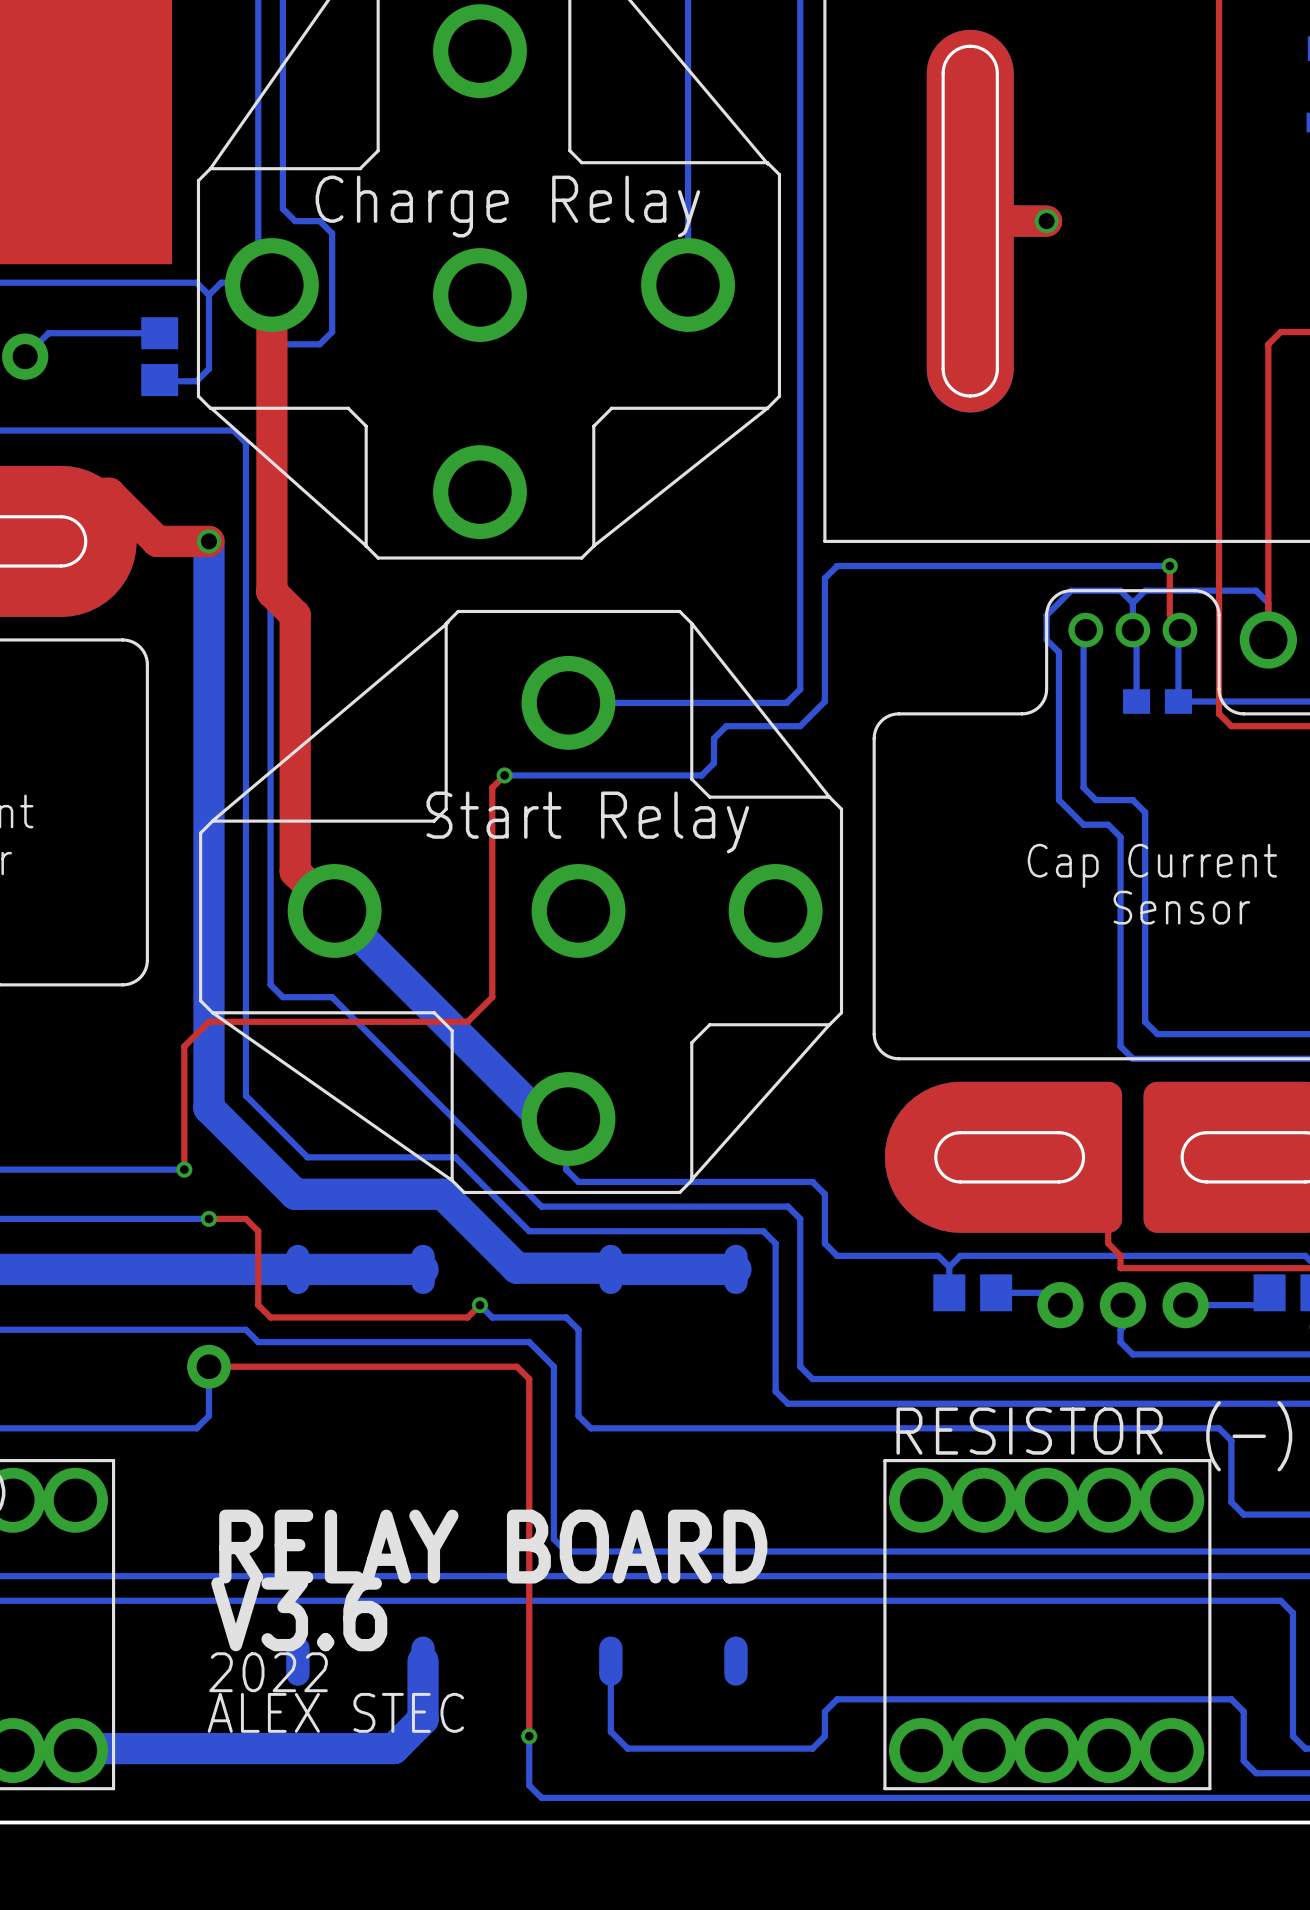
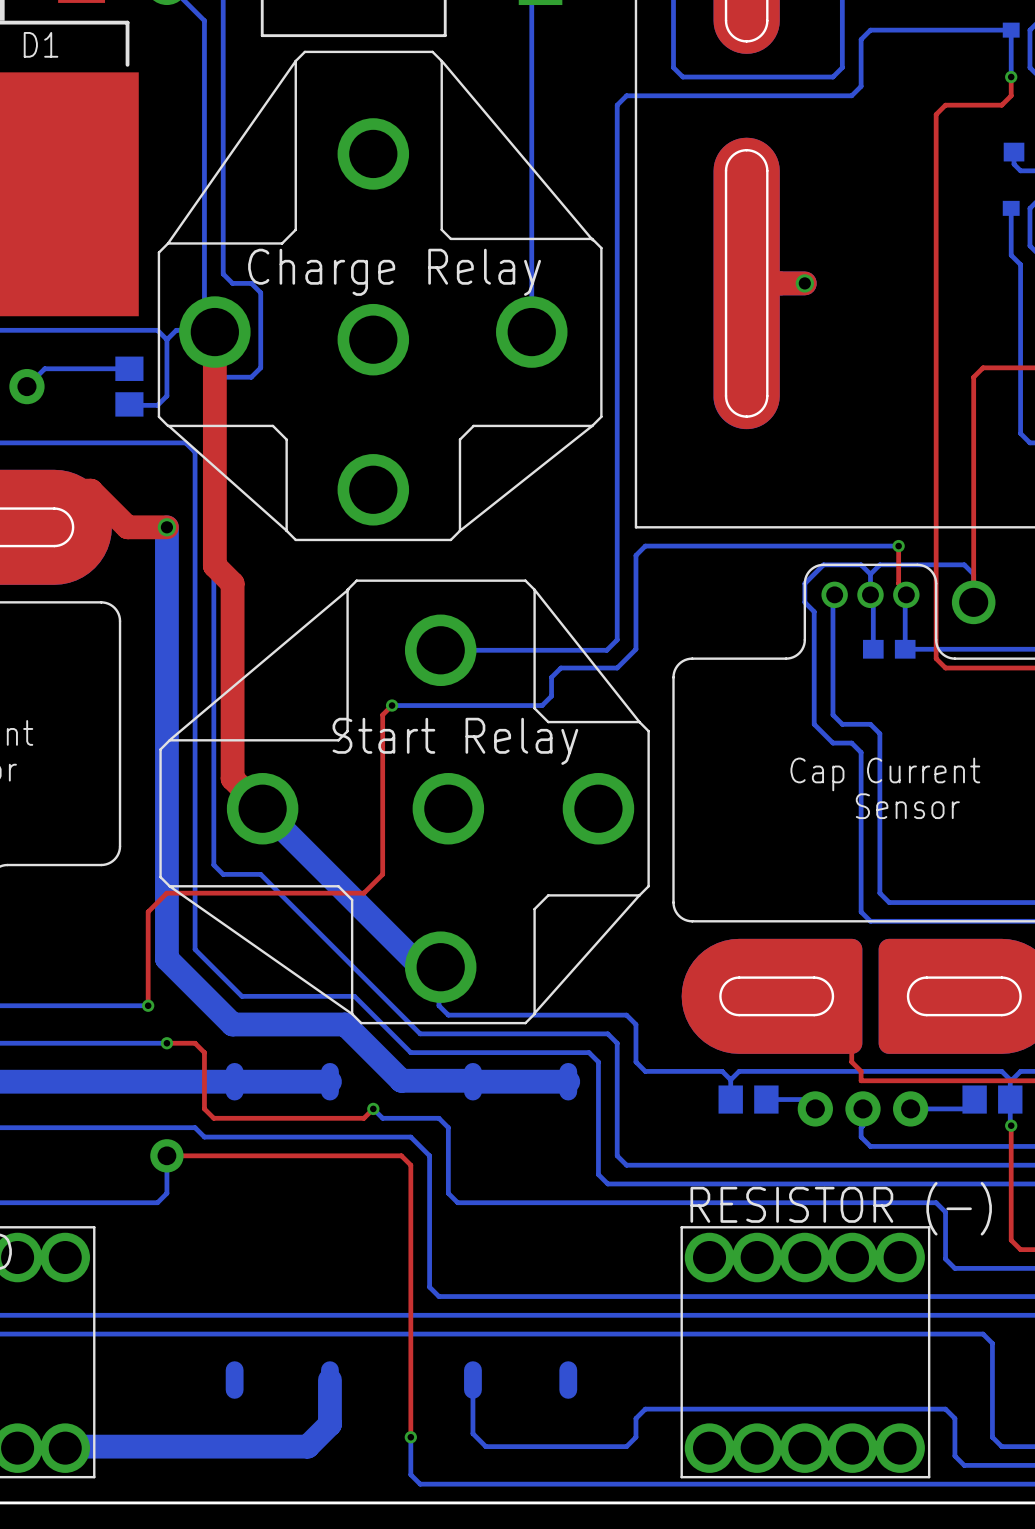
text: RELAY BOARD (493, 1546) -> none
text: V3.6 (299, 1614) -> none
text: 2022 (268, 1672) -> none
text: ALEX STEC (335, 1712) -> none

